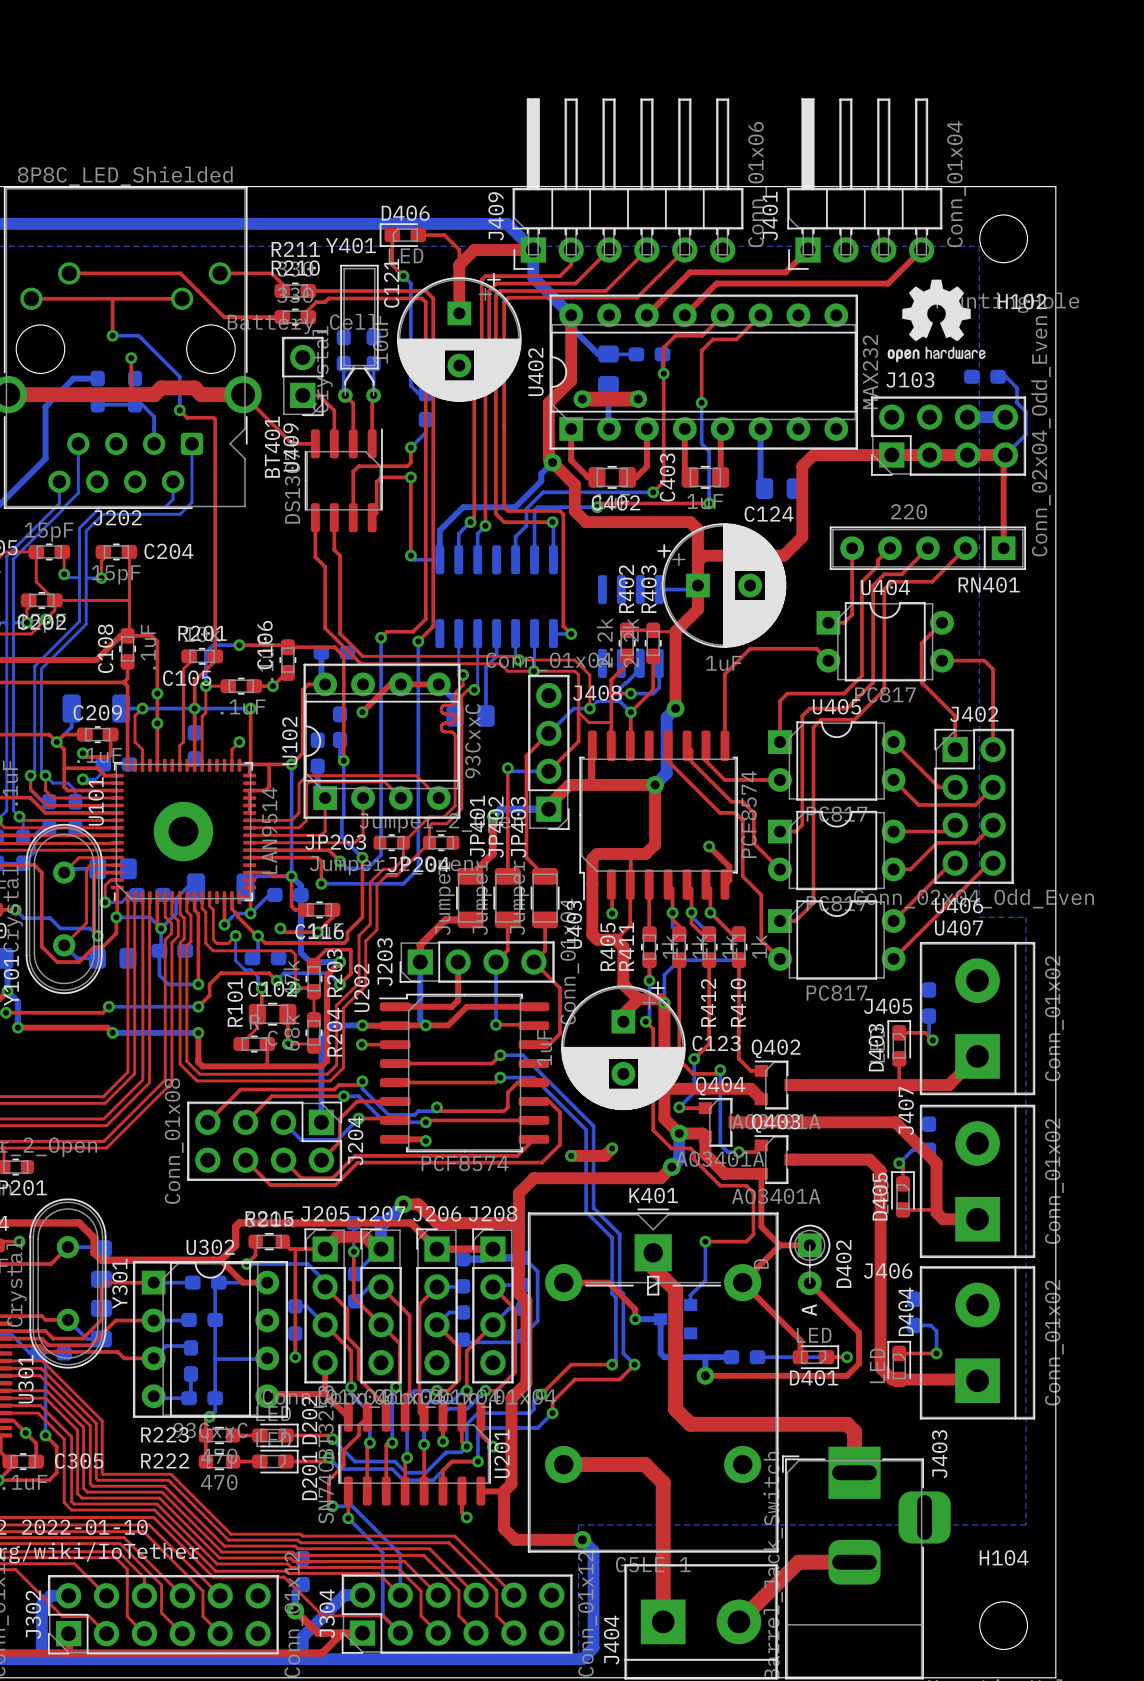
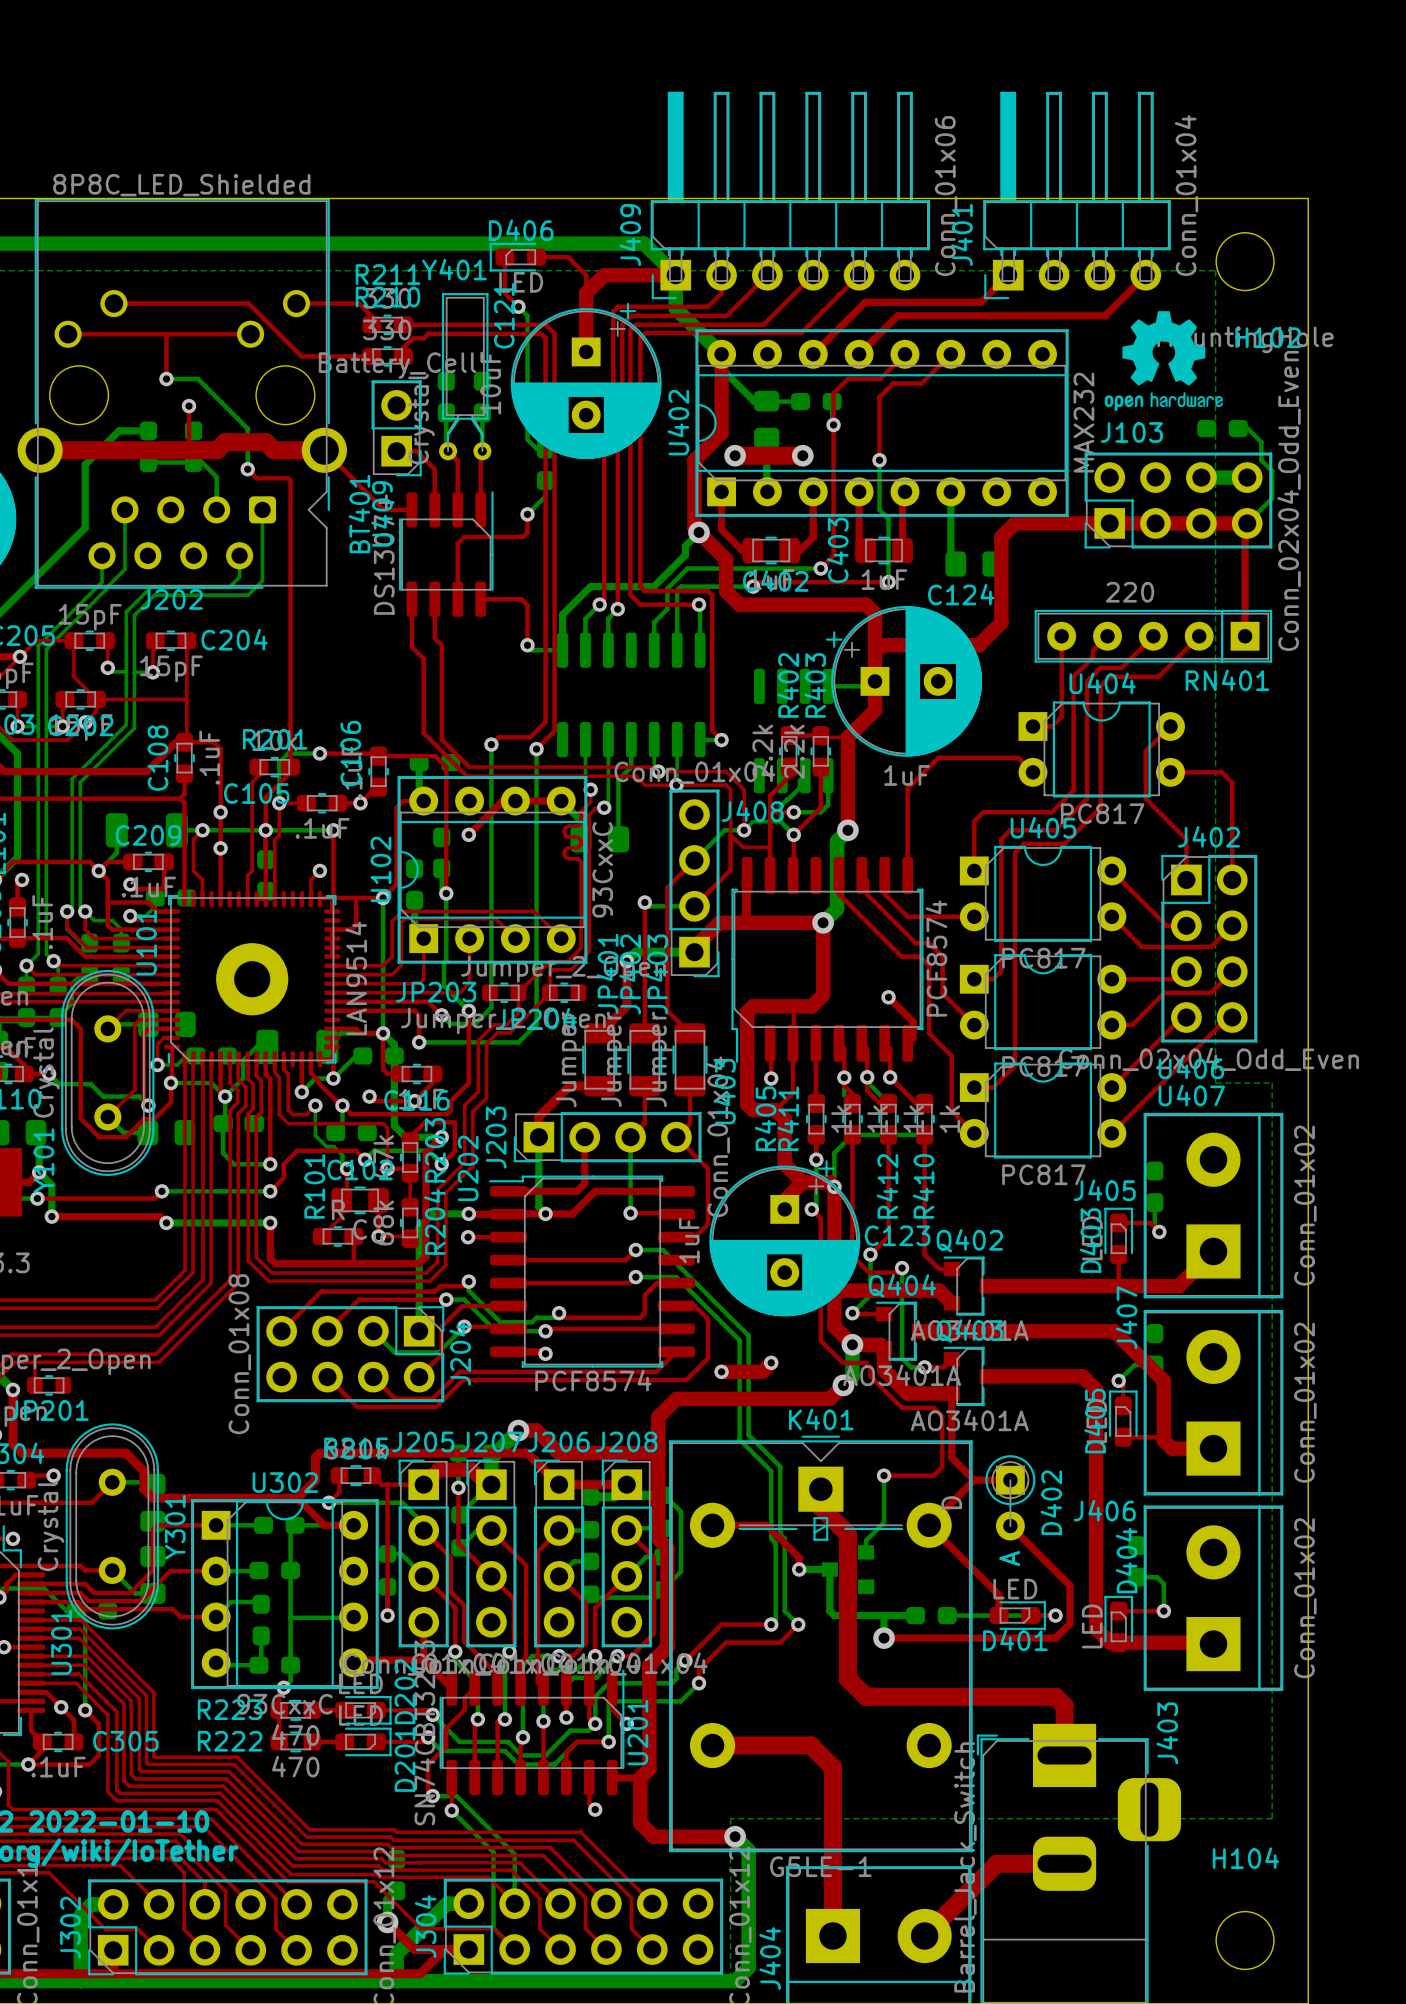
via: (410, 477) -> none
top track: (372, 517) (376, 513) (376, 481) (381, 477) (410, 477) (410, 522) -> (480, 599) (521, 599) (527, 605)

